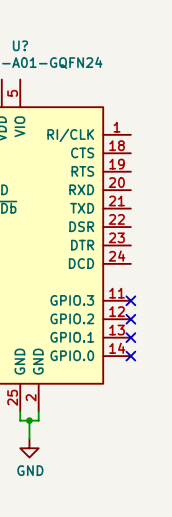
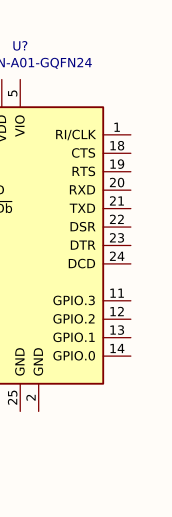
no-connect mark: (130, 300) -> none
no-connect mark: (130, 319) -> none
no-connect mark: (130, 337) -> none
no-connect mark: (130, 356) -> none
wire: (20, 411) (20, 420) (38, 420) (38, 411) -> none
wire: (29, 420) (29, 439) -> none
junction: (29, 420) -> none
power symbol: GND (29, 448) -> none

